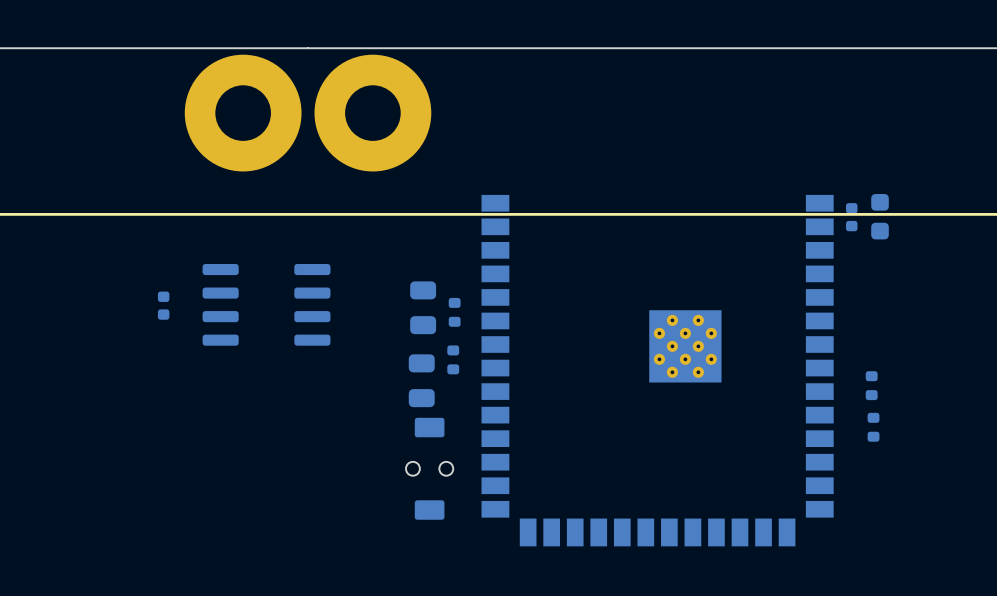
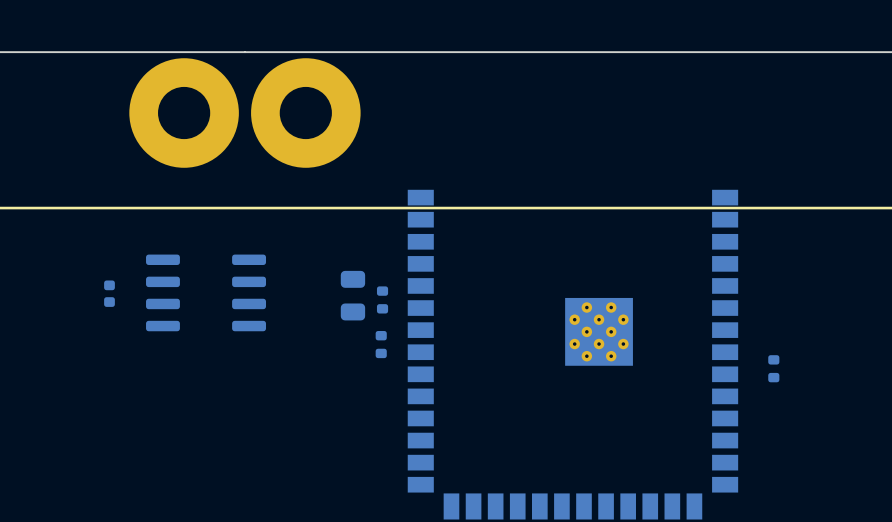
part: (880, 216) -> none
part: (851, 217) -> none
part: (421, 380) -> none
part: (873, 427) -> none
part: (429, 468) -> none

